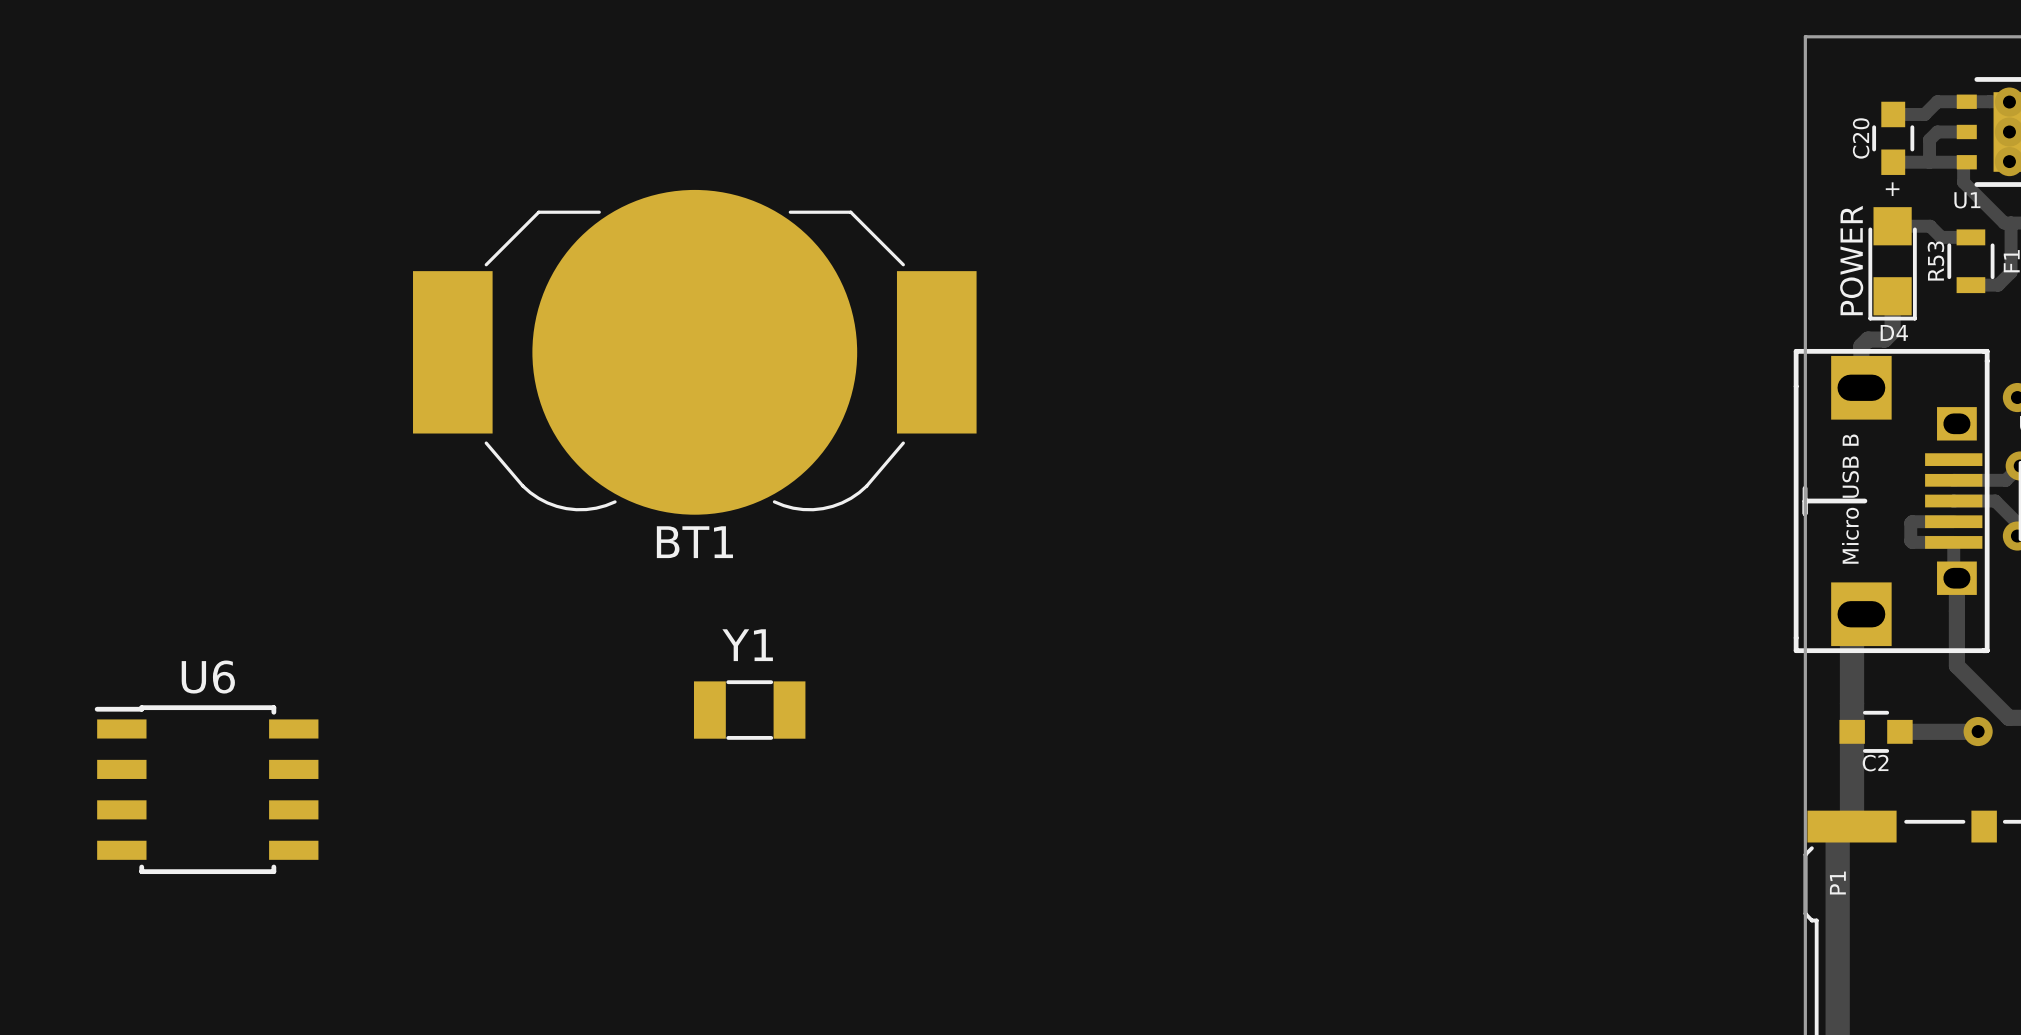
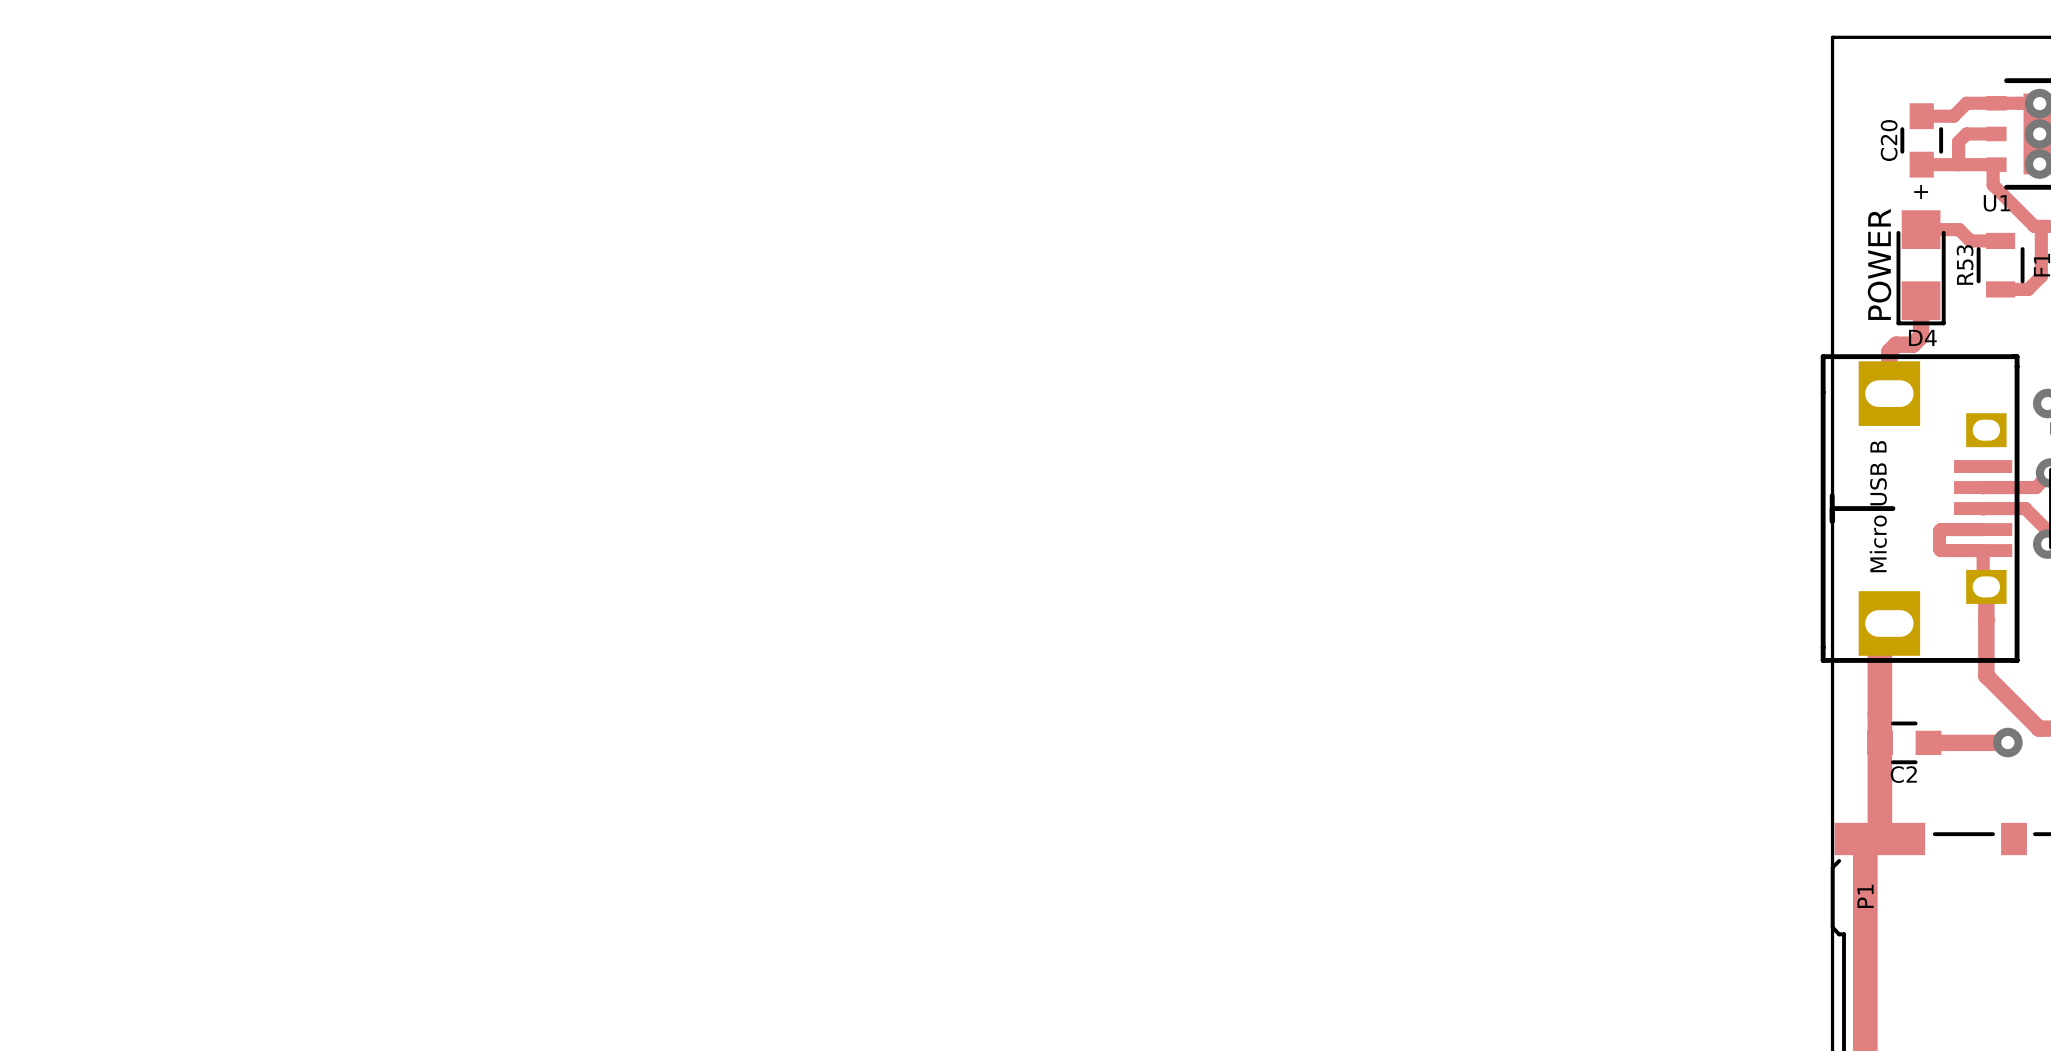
BT1: (694, 352) -> none
Y1: (749, 710) -> none
U6: (206, 789) -> none

